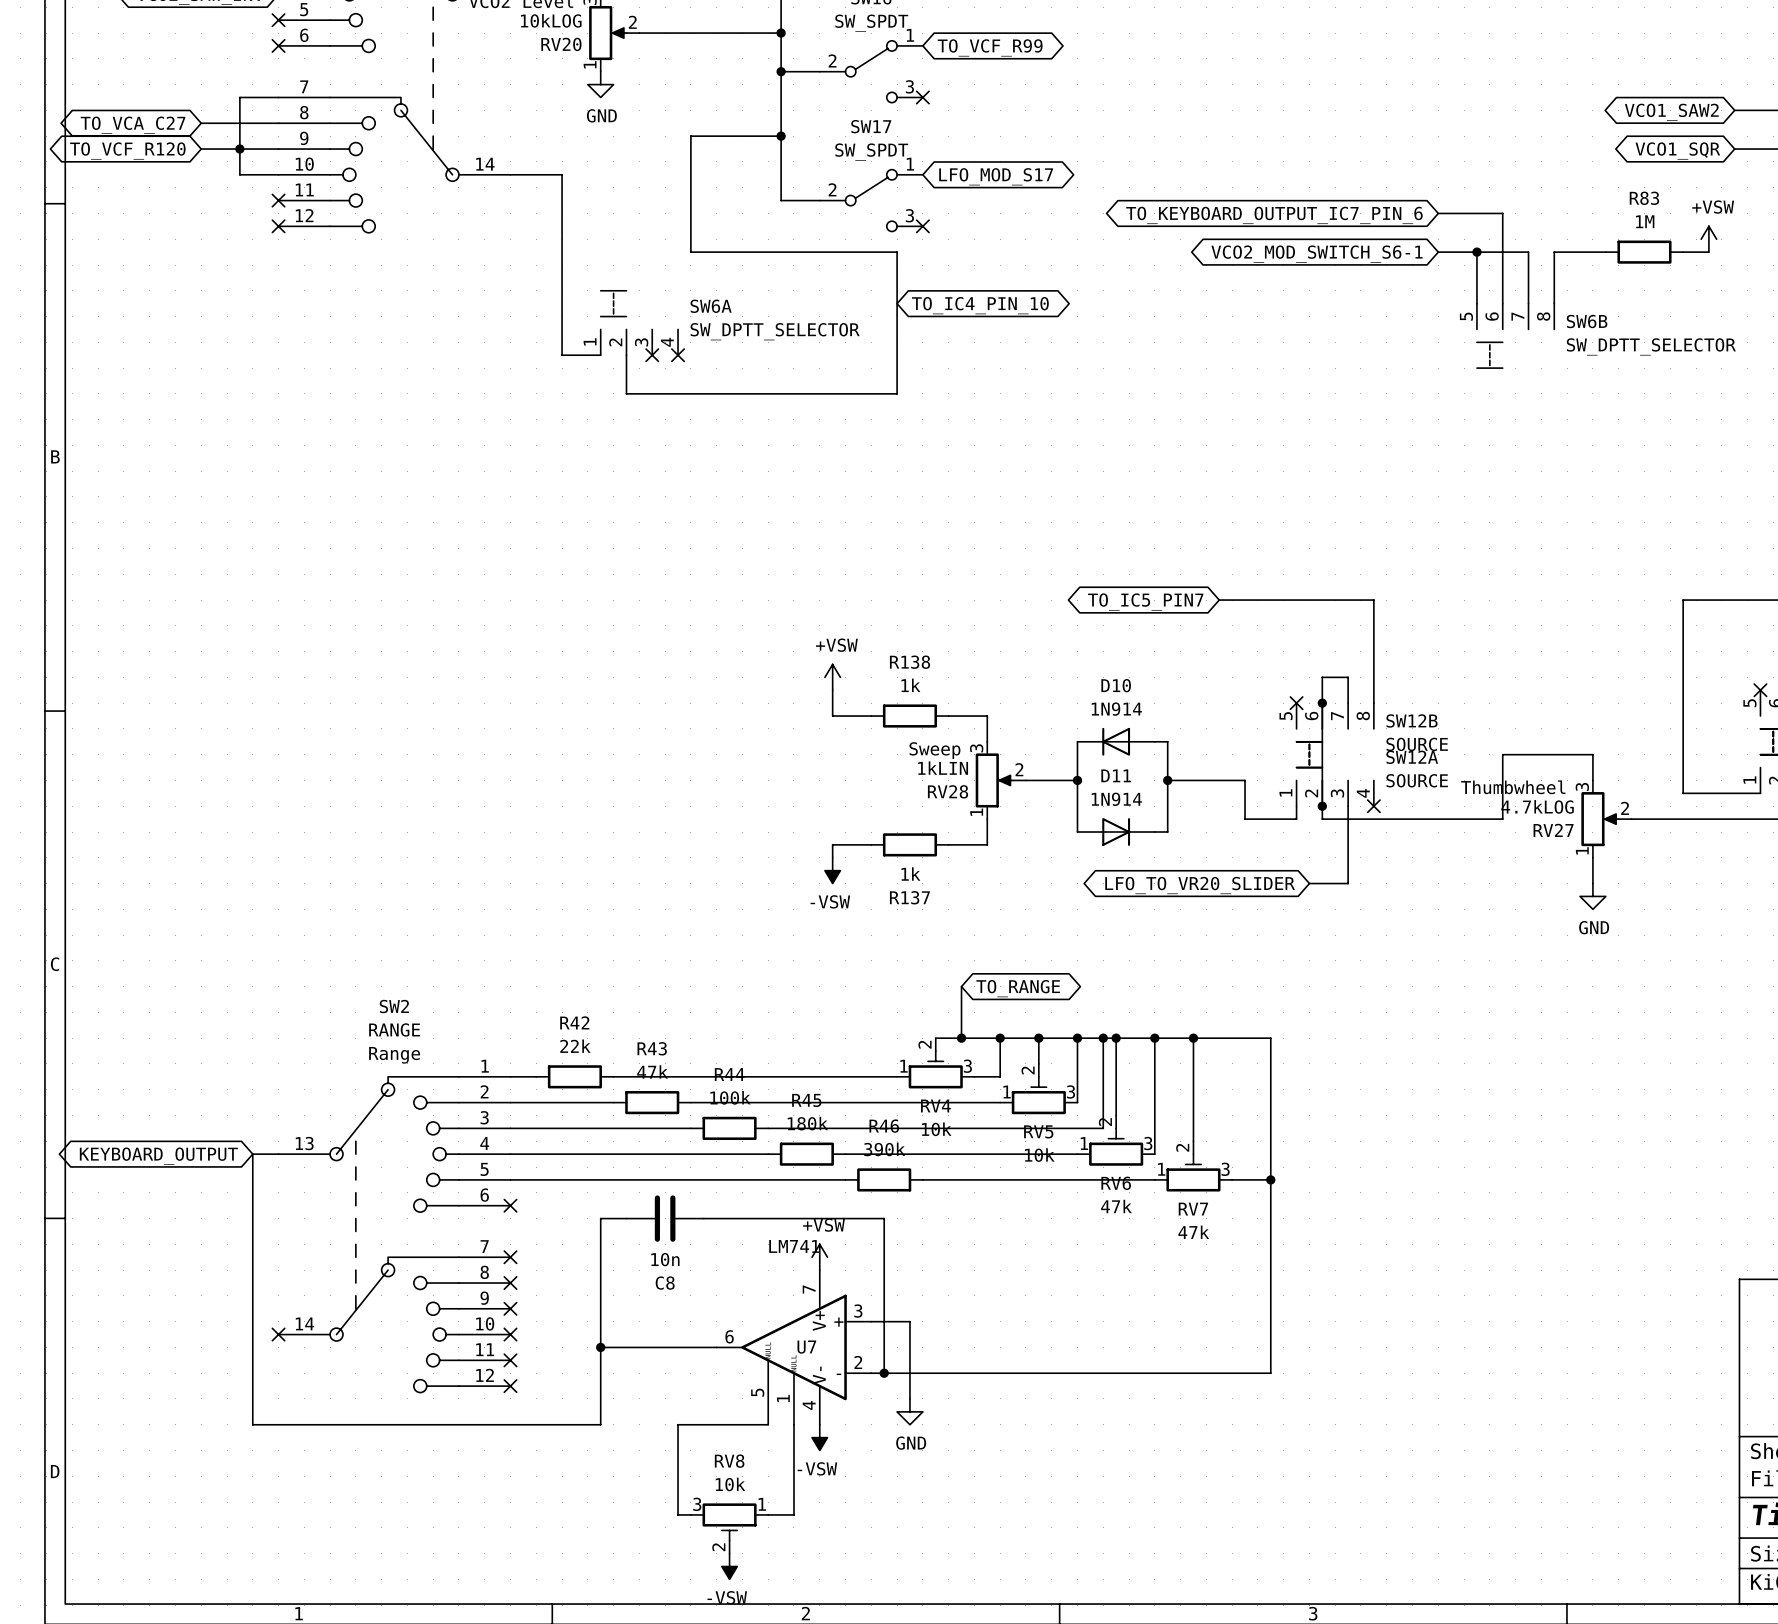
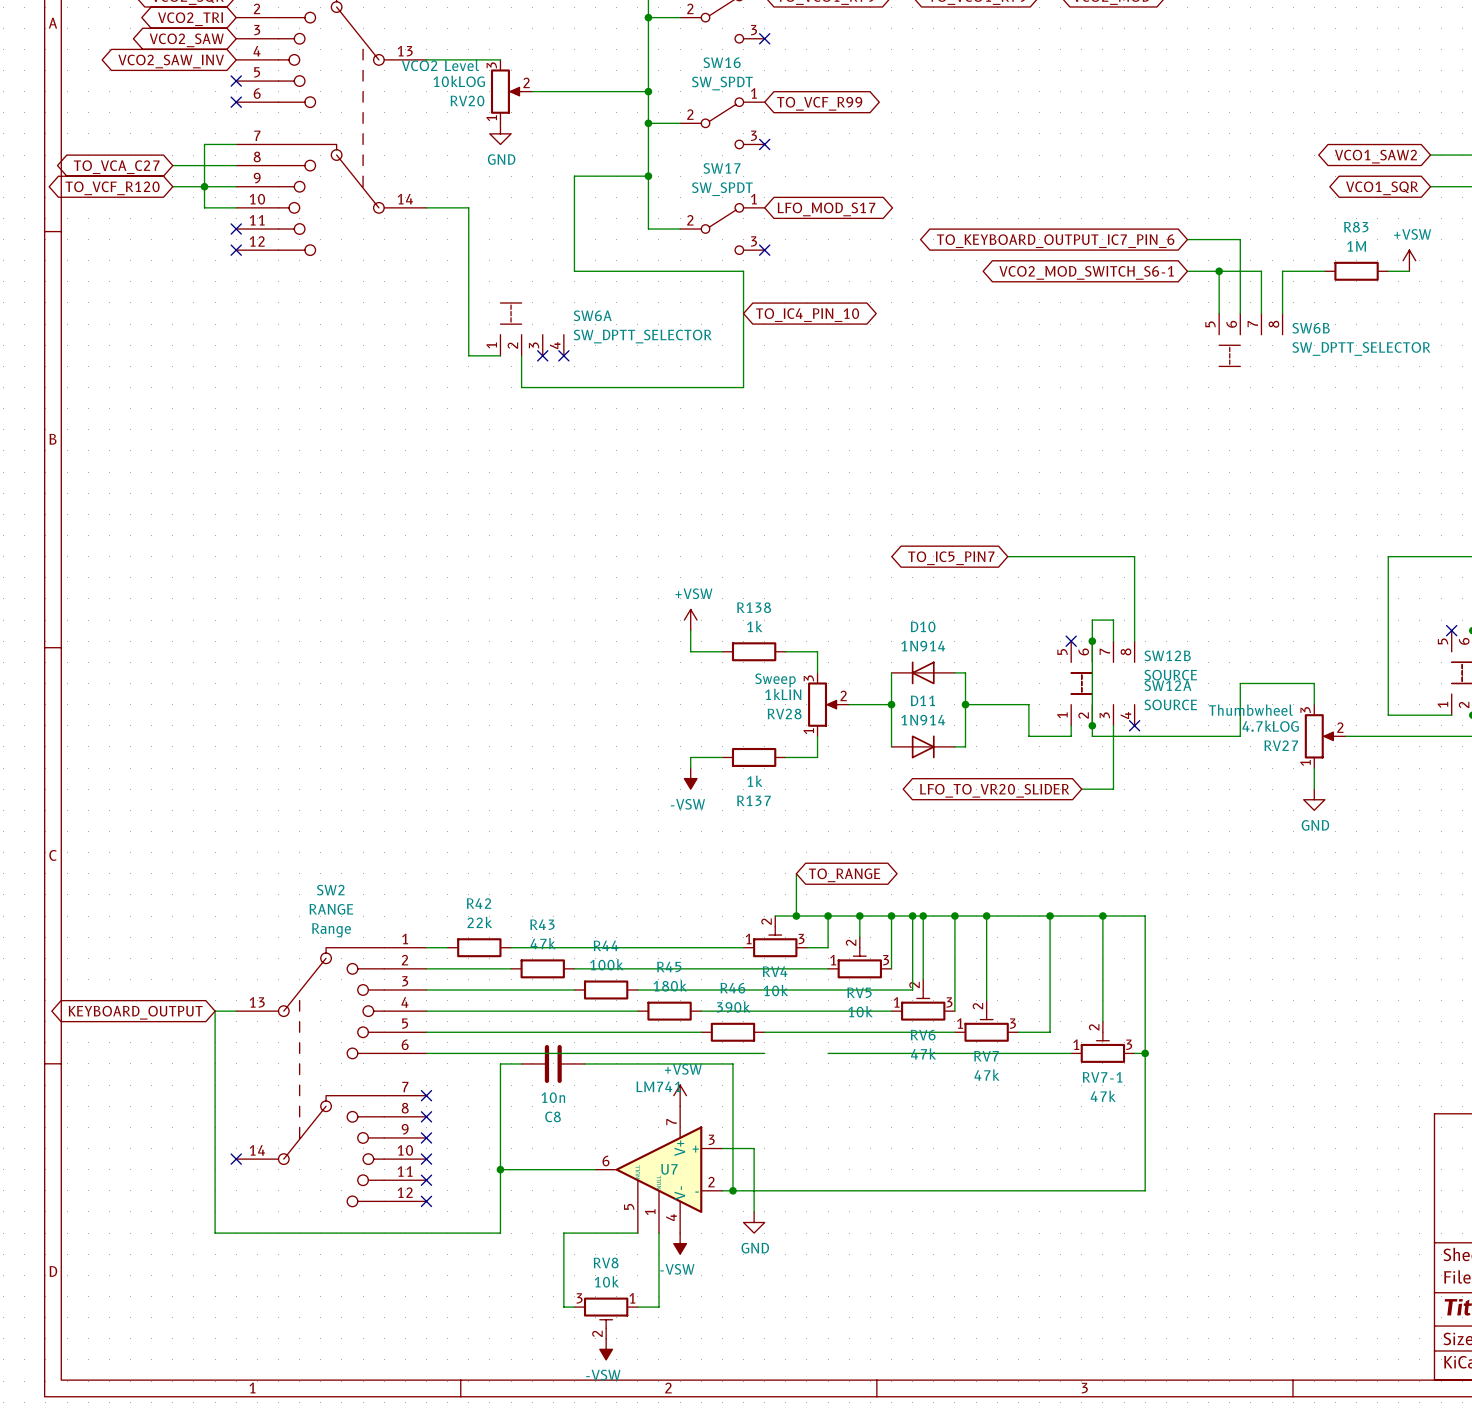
junction: none -> (1050, 916)
wire: none -> (1102, 916) (1102, 1021)
junction: none -> (1102, 916)
wire: (1270, 1179) (1270, 1373) -> (1050, 916) (1145, 916) (1145, 1190) (1050, 1190)
junction: (1270, 1179) -> none
RV7-1: none -> 47k (1102, 1042)
wire: none -> (426, 1053) (764, 1053)
no-connect mark: (510, 1205) -> none
wire: none -> (828, 1053) (1071, 1053)
wire: none -> (1134, 1053) (1145, 1053)
junction: none -> (1145, 1053)

